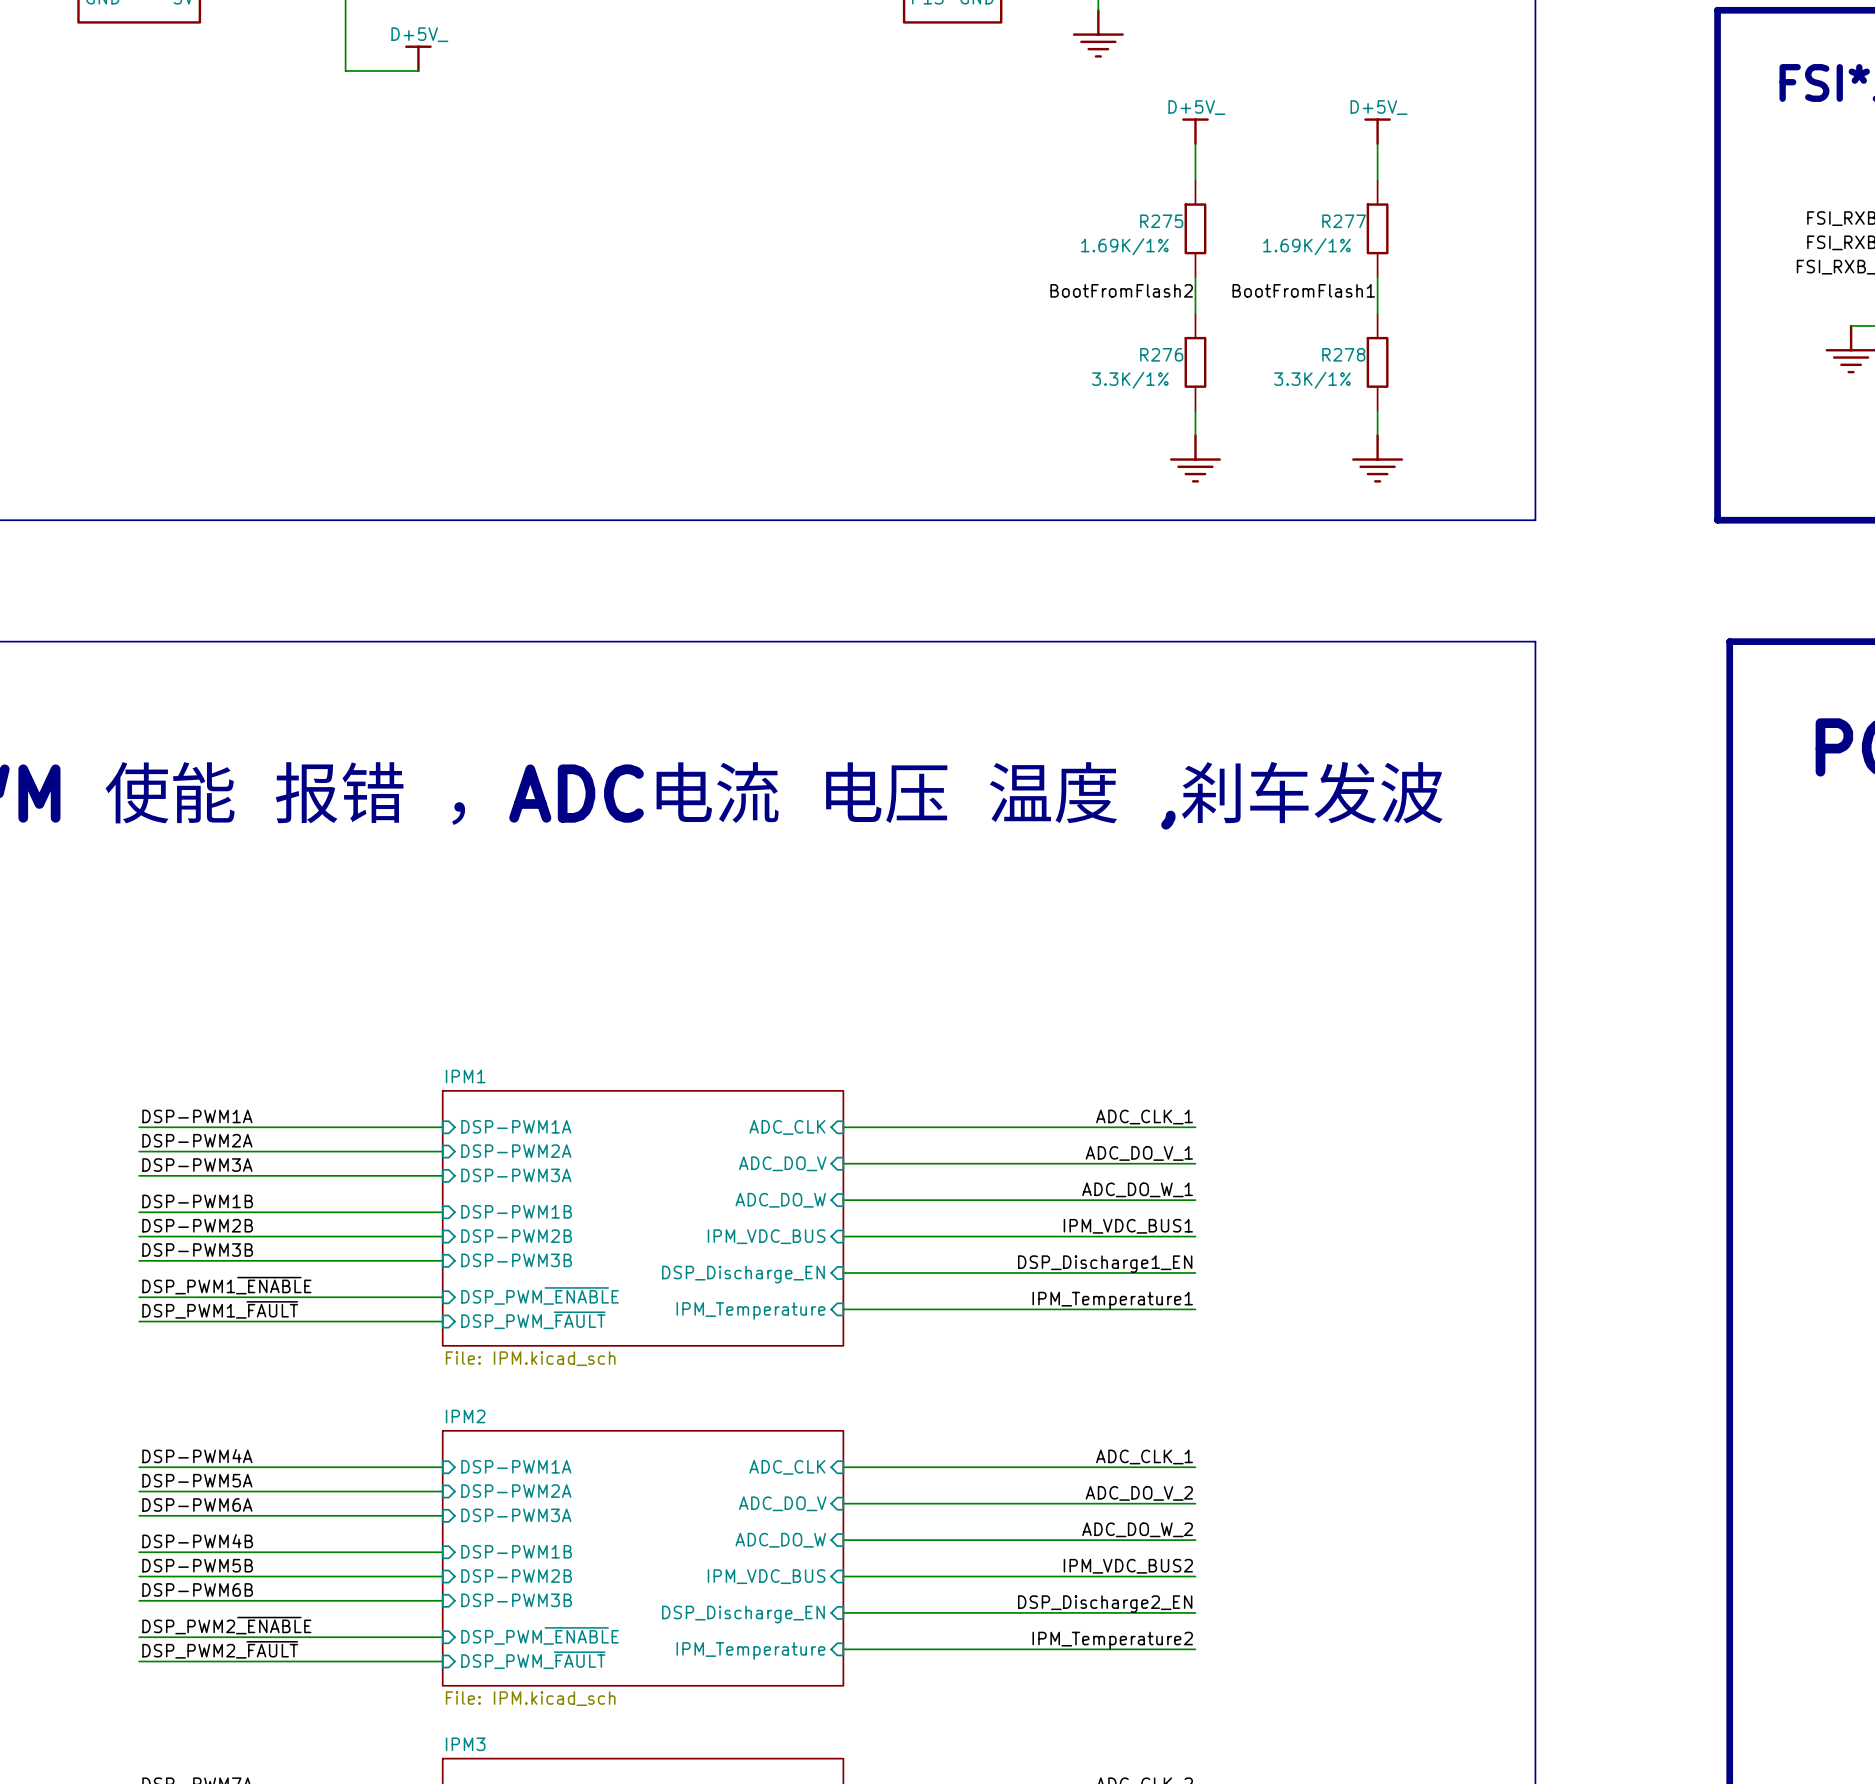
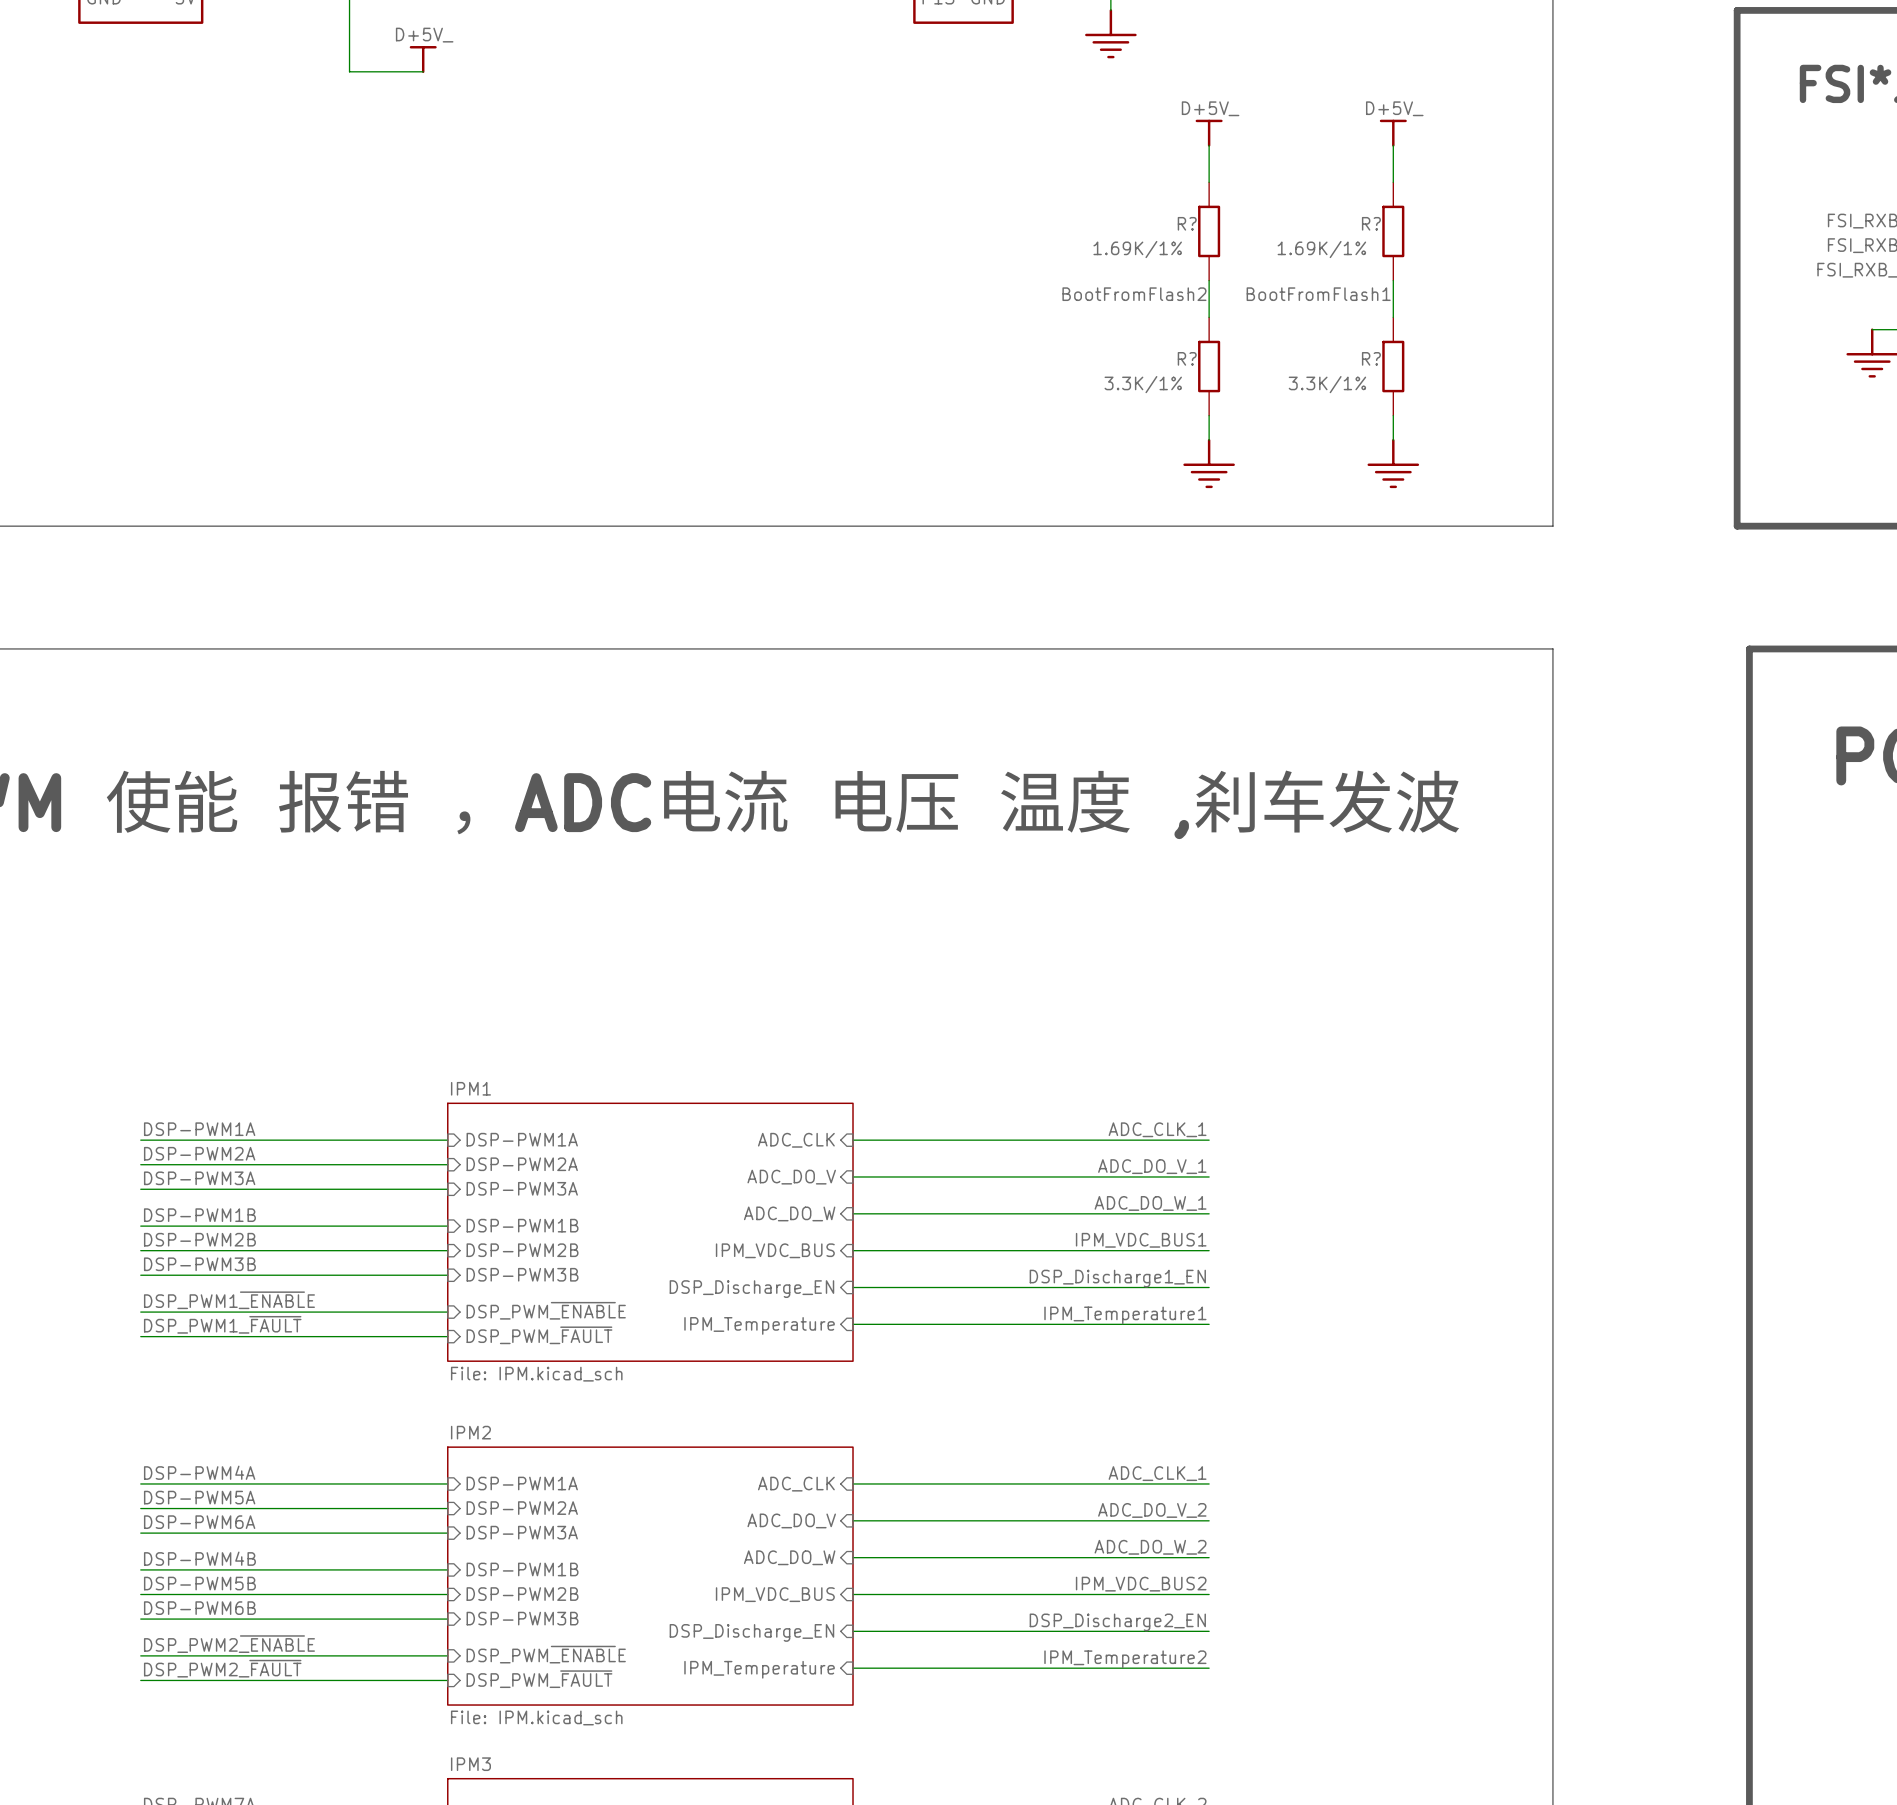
R275 name: R275 (1161, 221) -> R? (1187, 223)
R277 name: R277 (1344, 221) -> R? (1371, 223)
R276 name: R276 (1161, 354) -> R? (1187, 358)
R278 name: R278 (1343, 354) -> R? (1371, 358)

